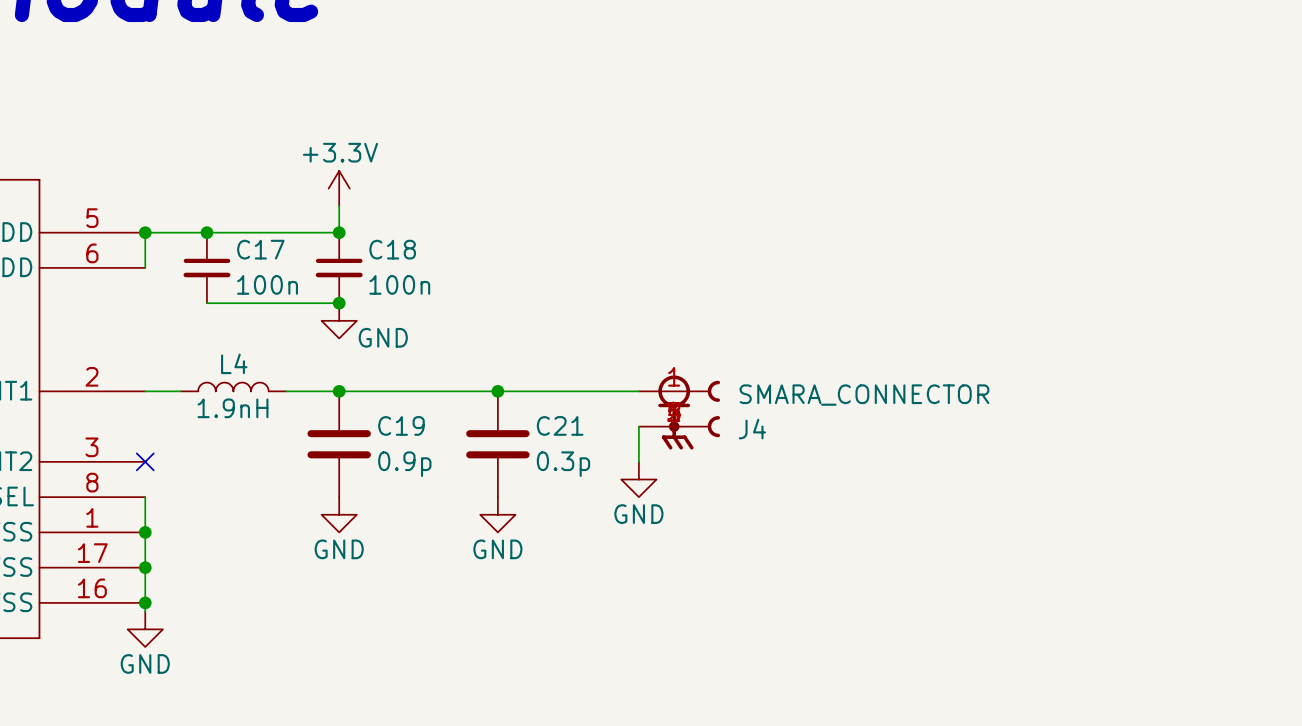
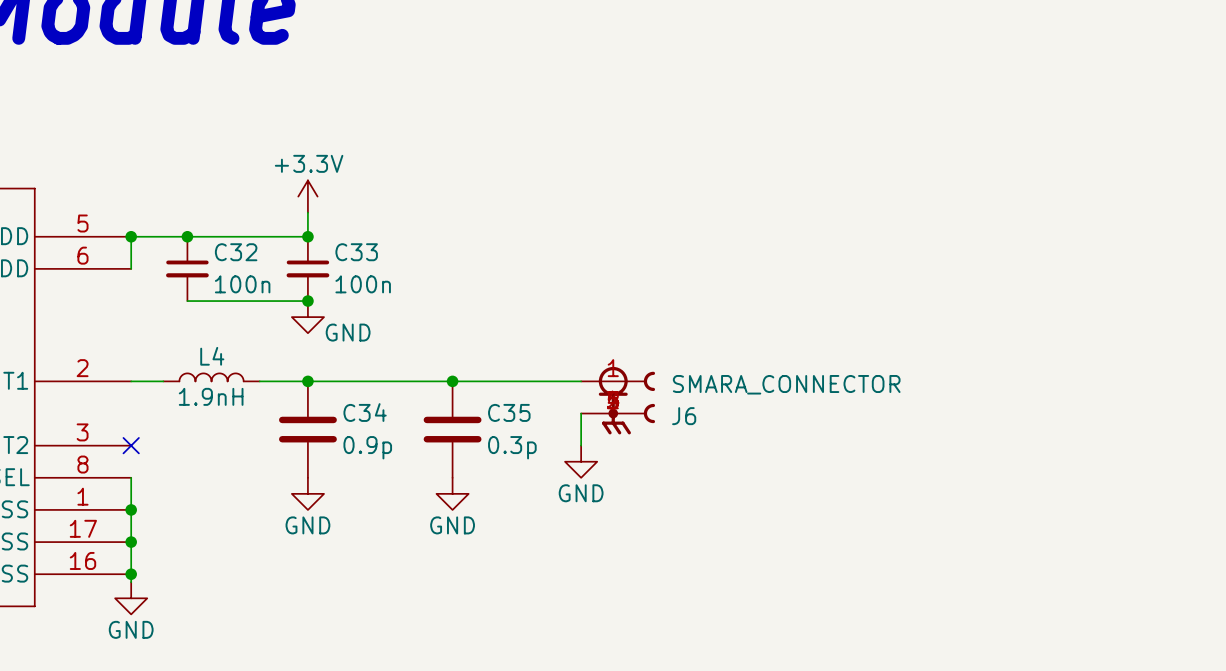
C17 name: C17 (260, 249) -> C32 (236, 252)
C18 name: C18 (392, 249) -> C33 (356, 252)
C19 name: C19 (401, 425) -> C34 (365, 412)
C21 name: C21 (560, 425) -> C35 (509, 412)
J4 name: J4 (752, 429) -> J6 (684, 416)

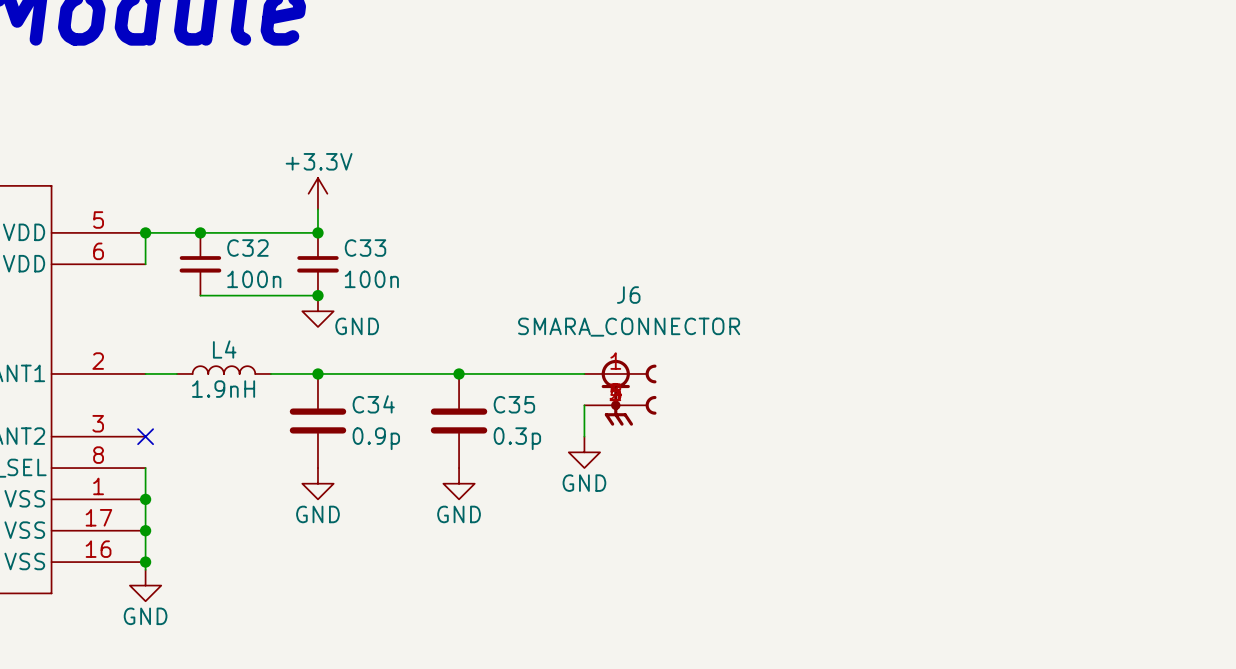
J6 value position: SMARA_CONNECTOR (786, 384) -> SMARA_CONNECTOR (629, 327)
J6 name position: J6 (684, 416) -> J6 (628, 295)

